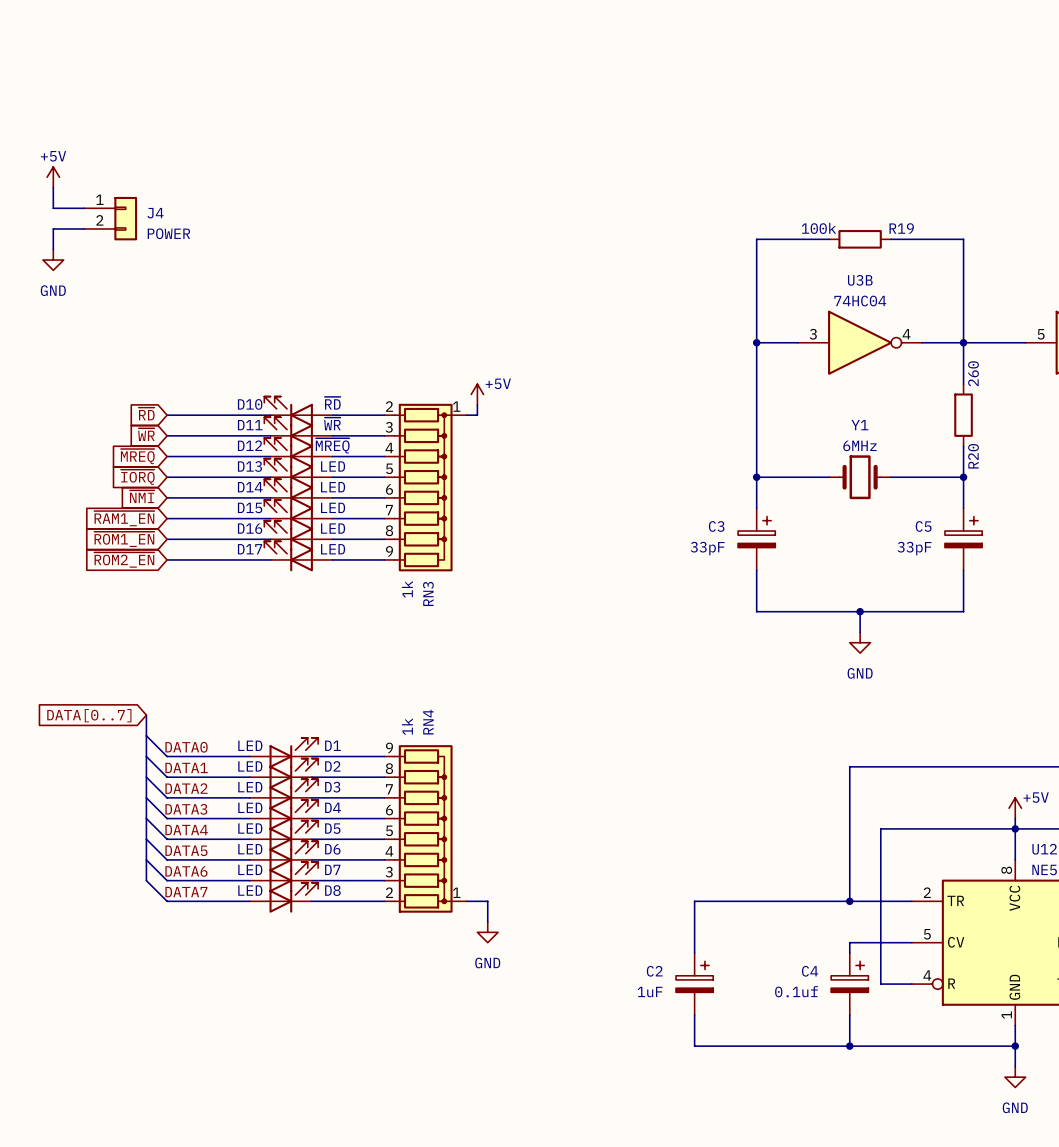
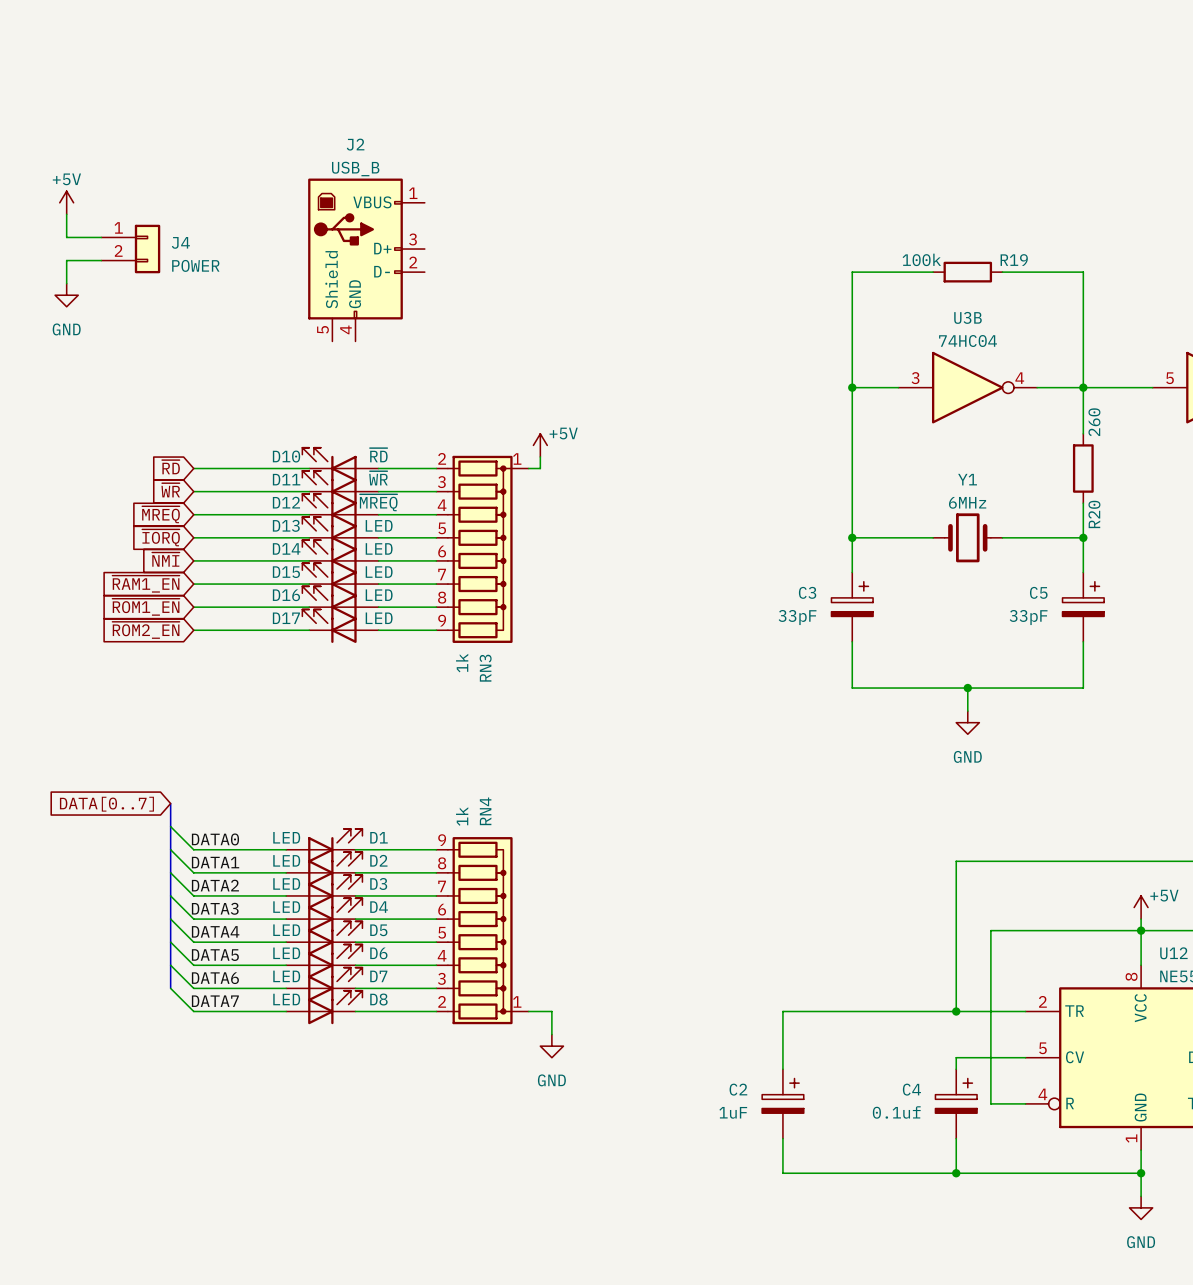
J2: none -> USB_B (366, 259)

